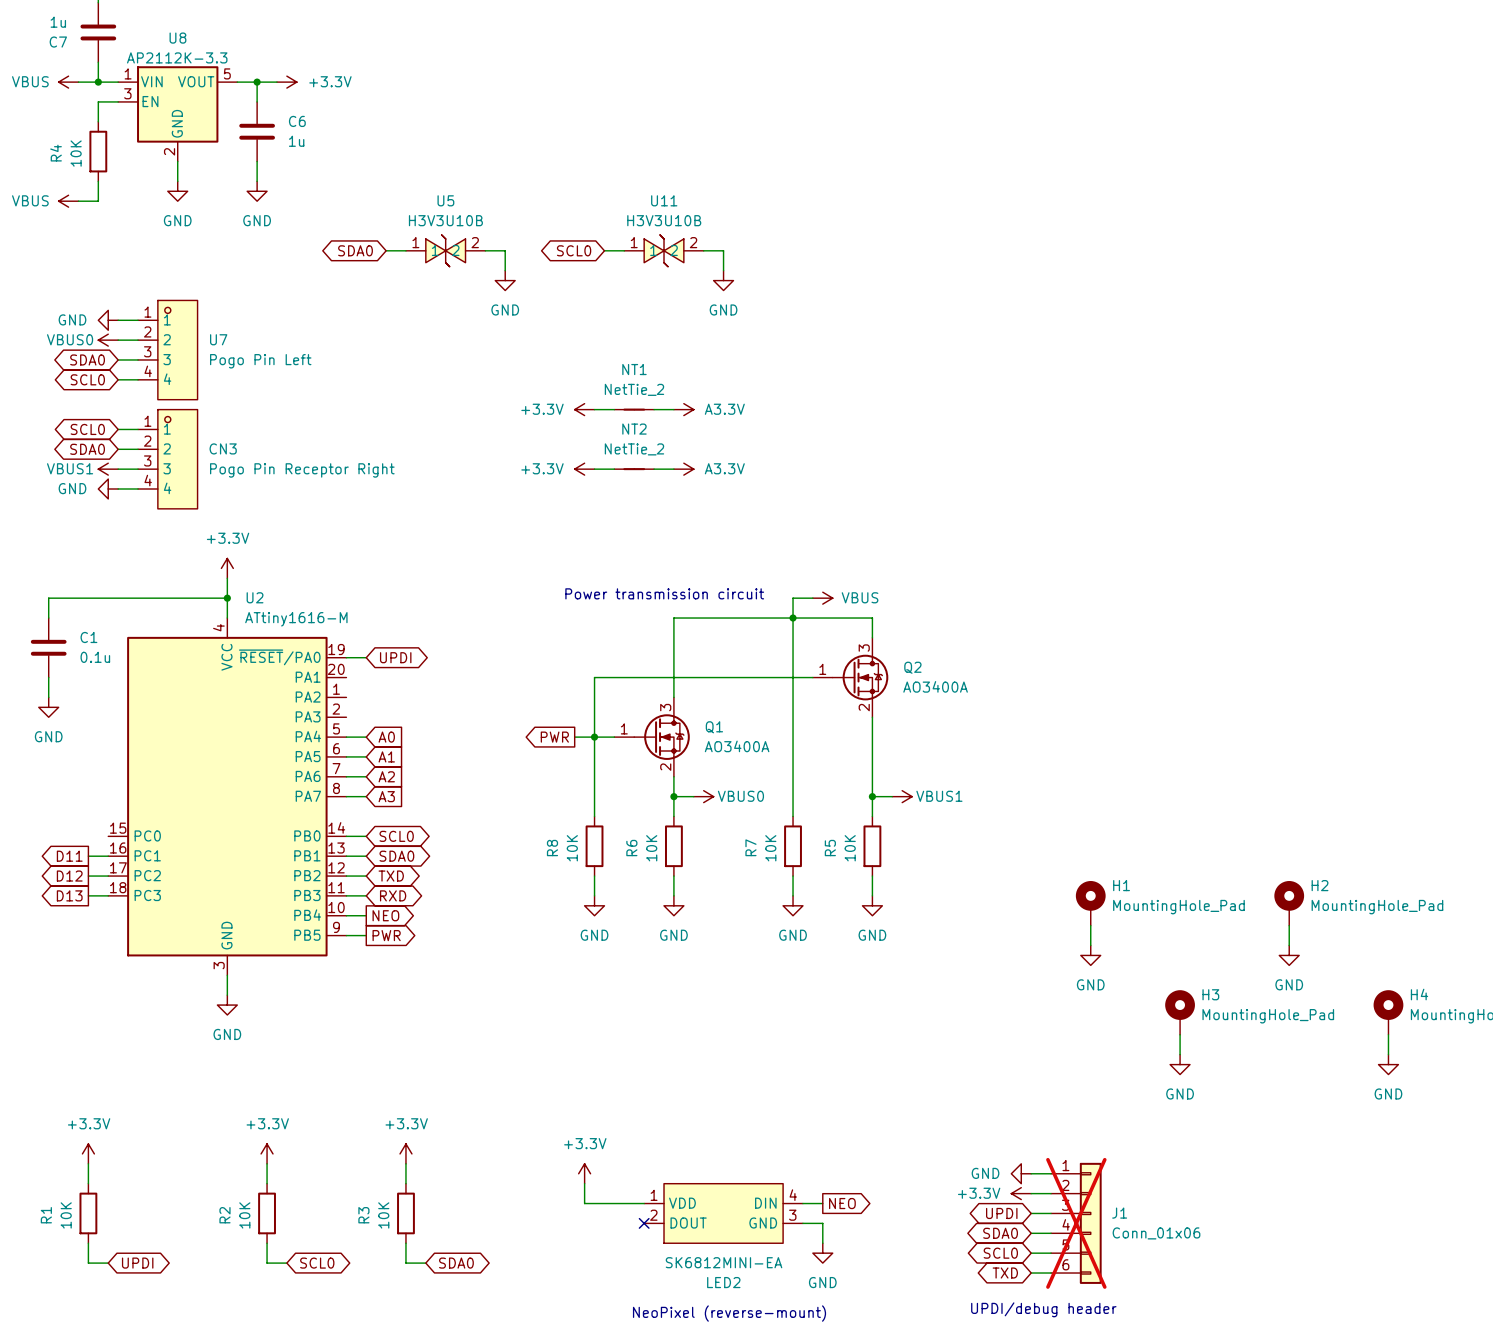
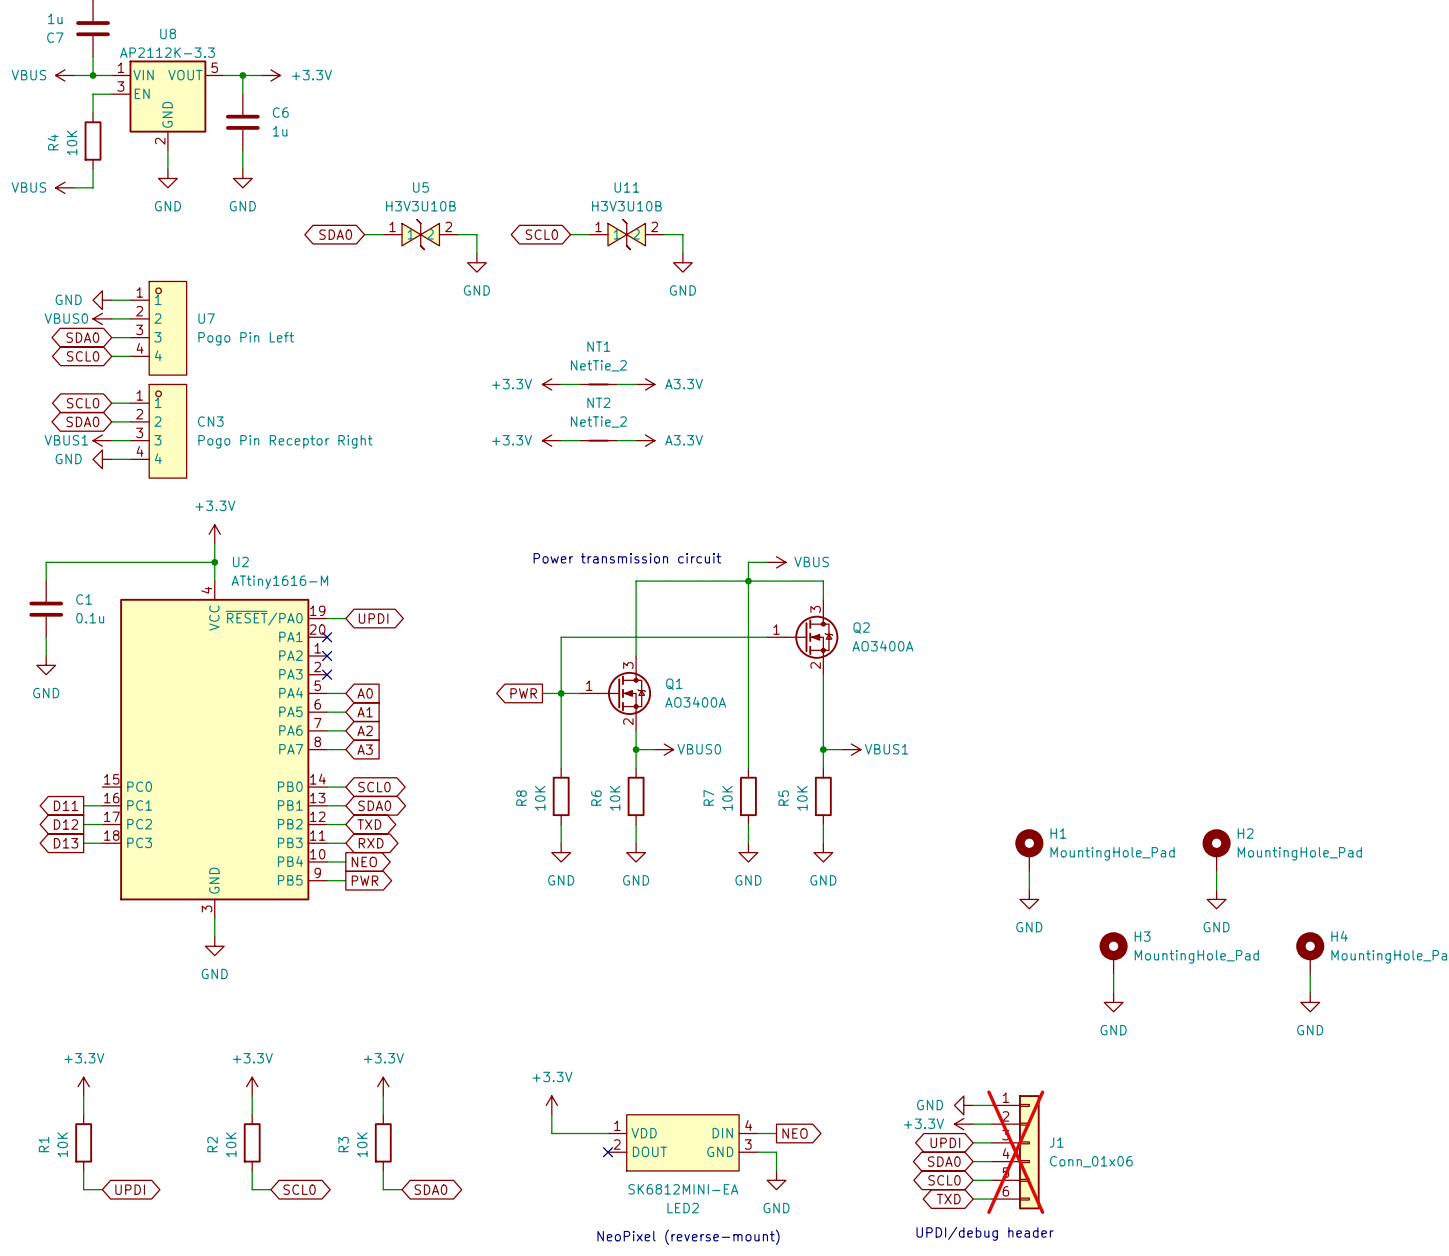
no-connect mark: none -> (327, 637)
no-connect mark: none -> (327, 655)
no-connect mark: none -> (327, 674)

